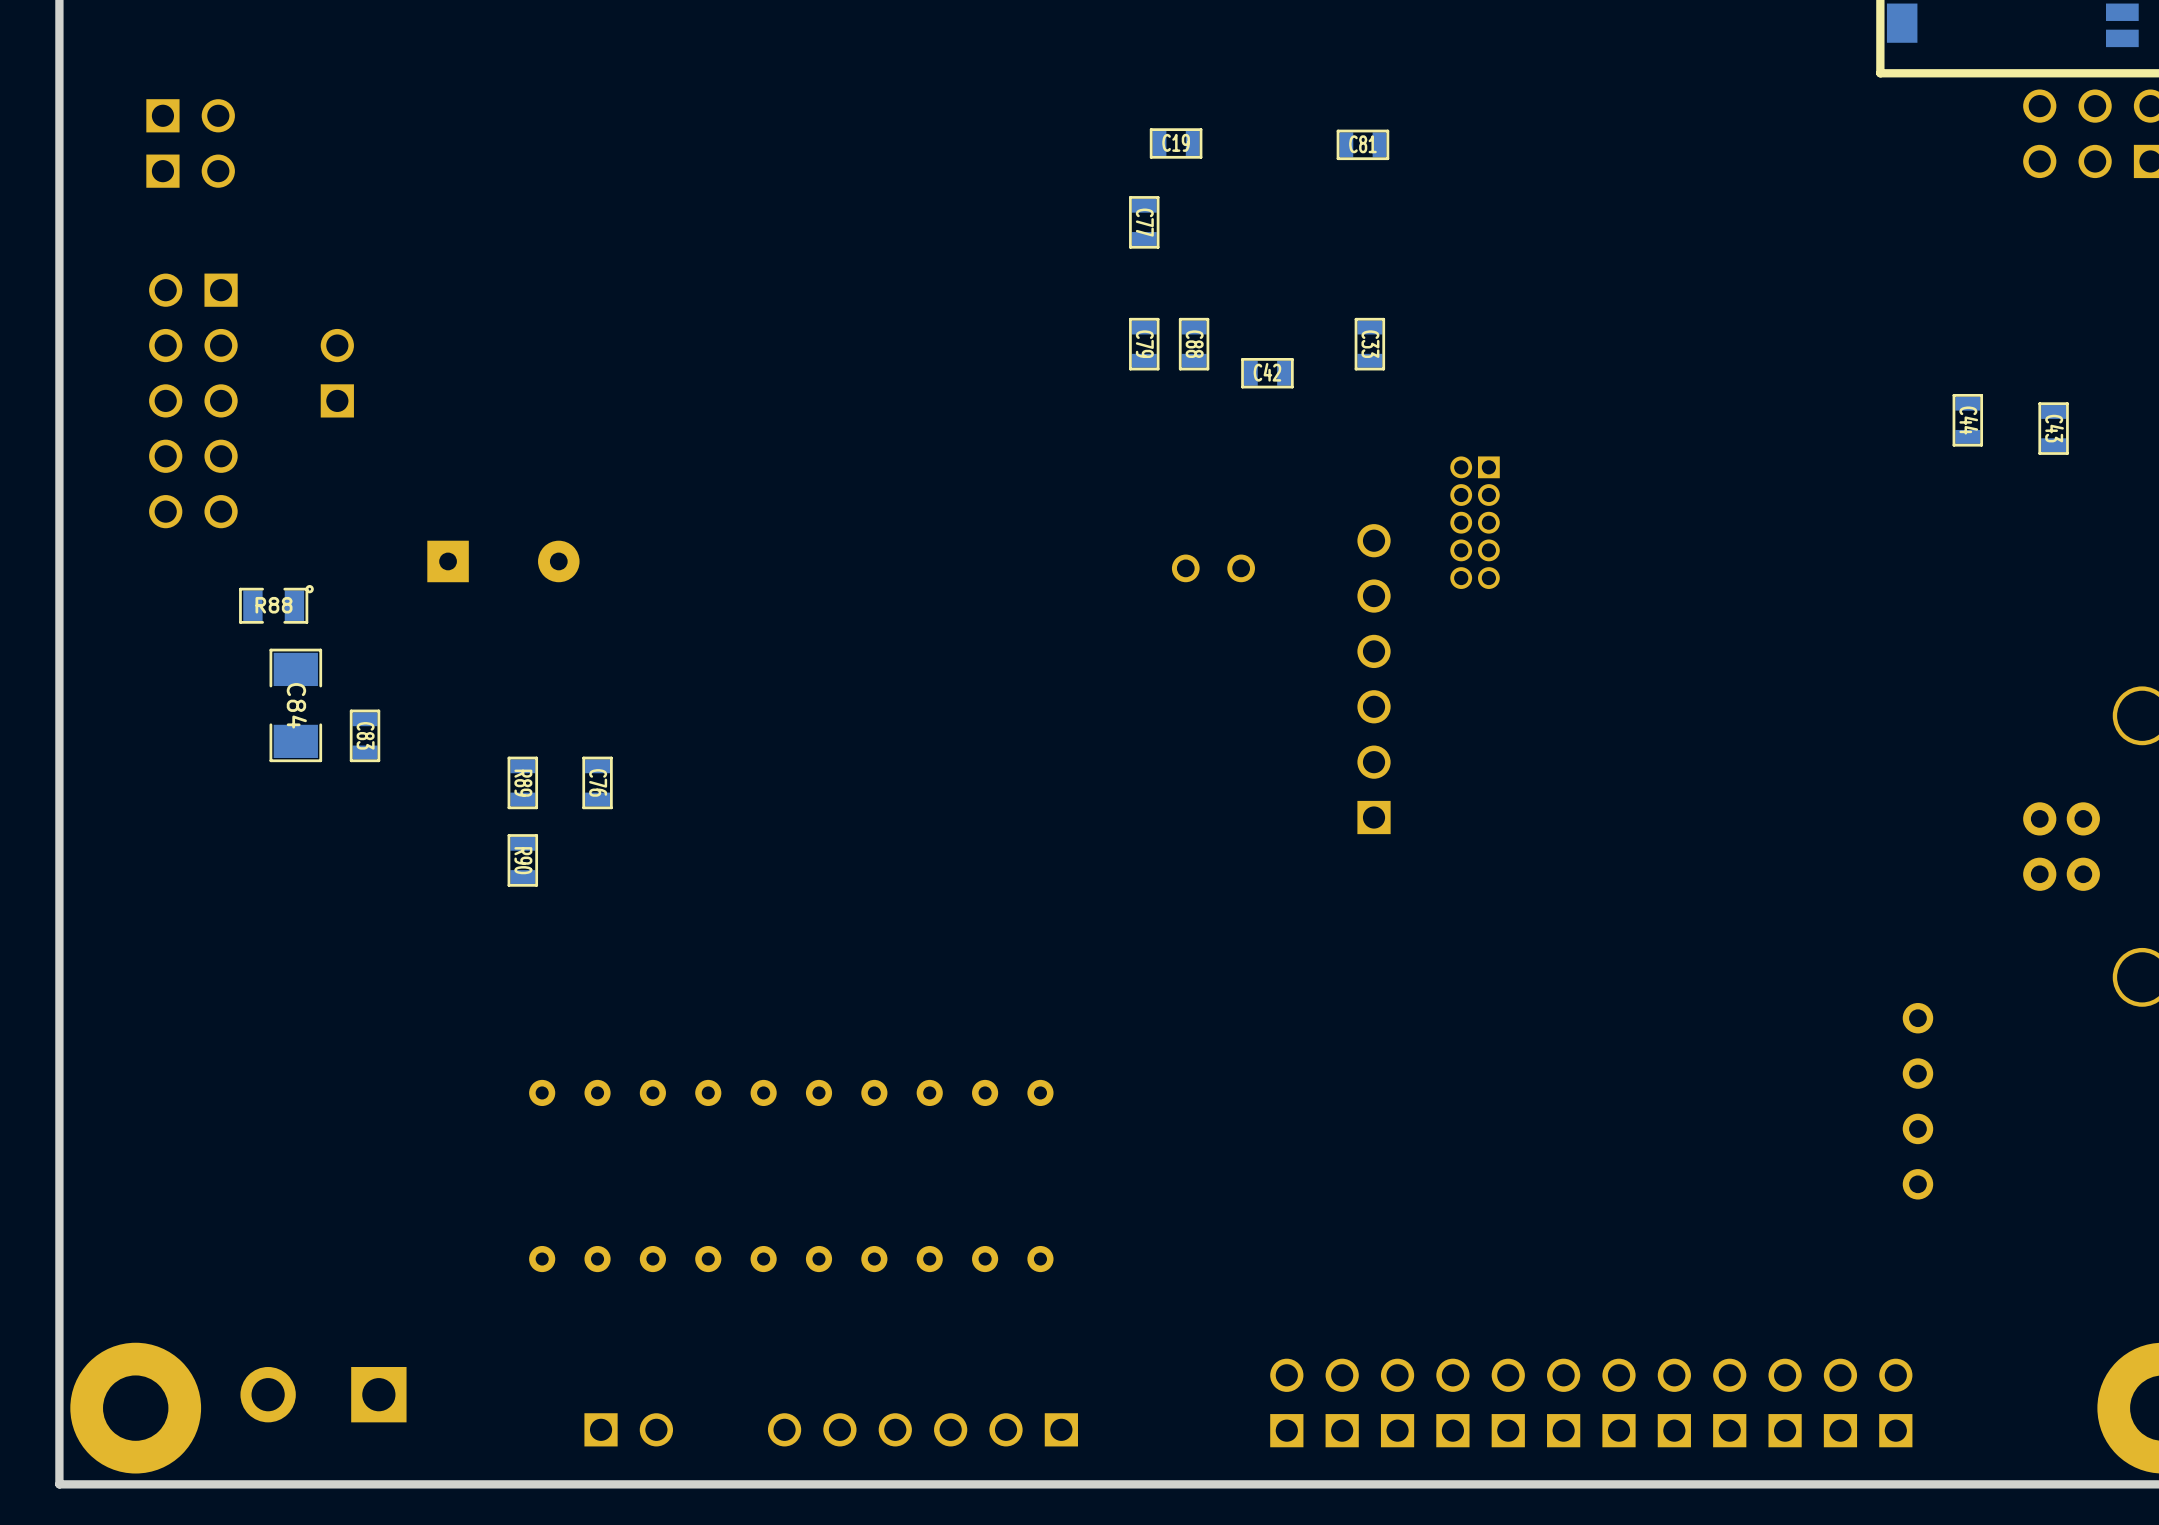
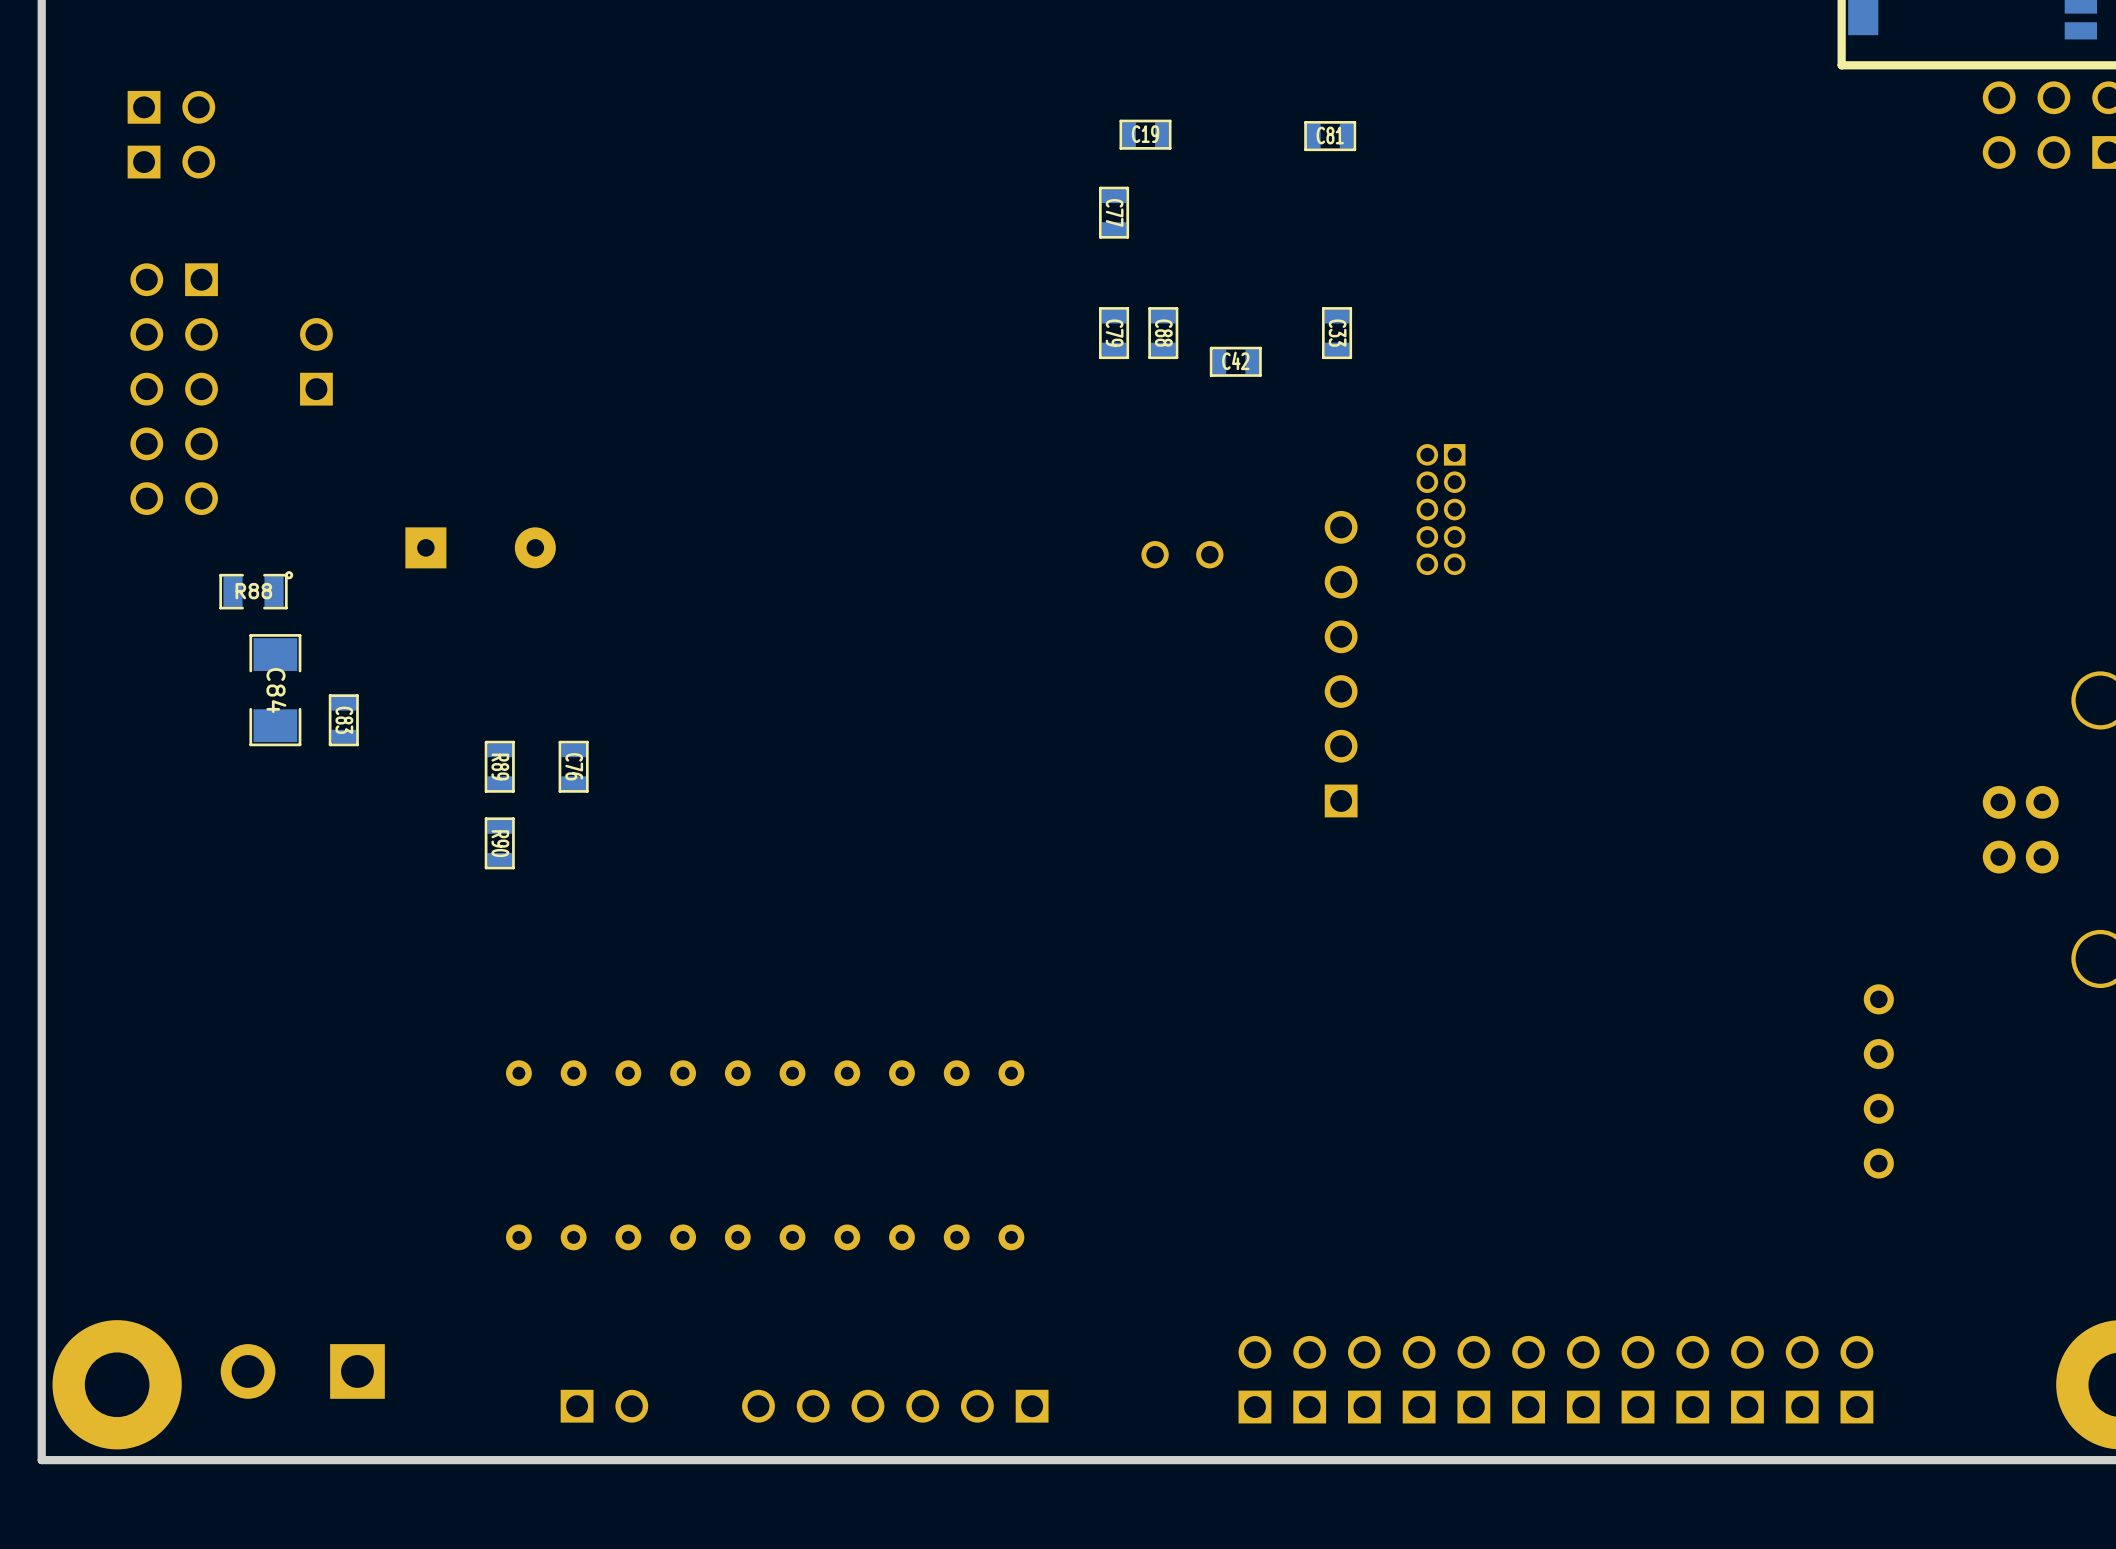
C44: (1967, 420) -> none
C43: (2053, 428) -> none

